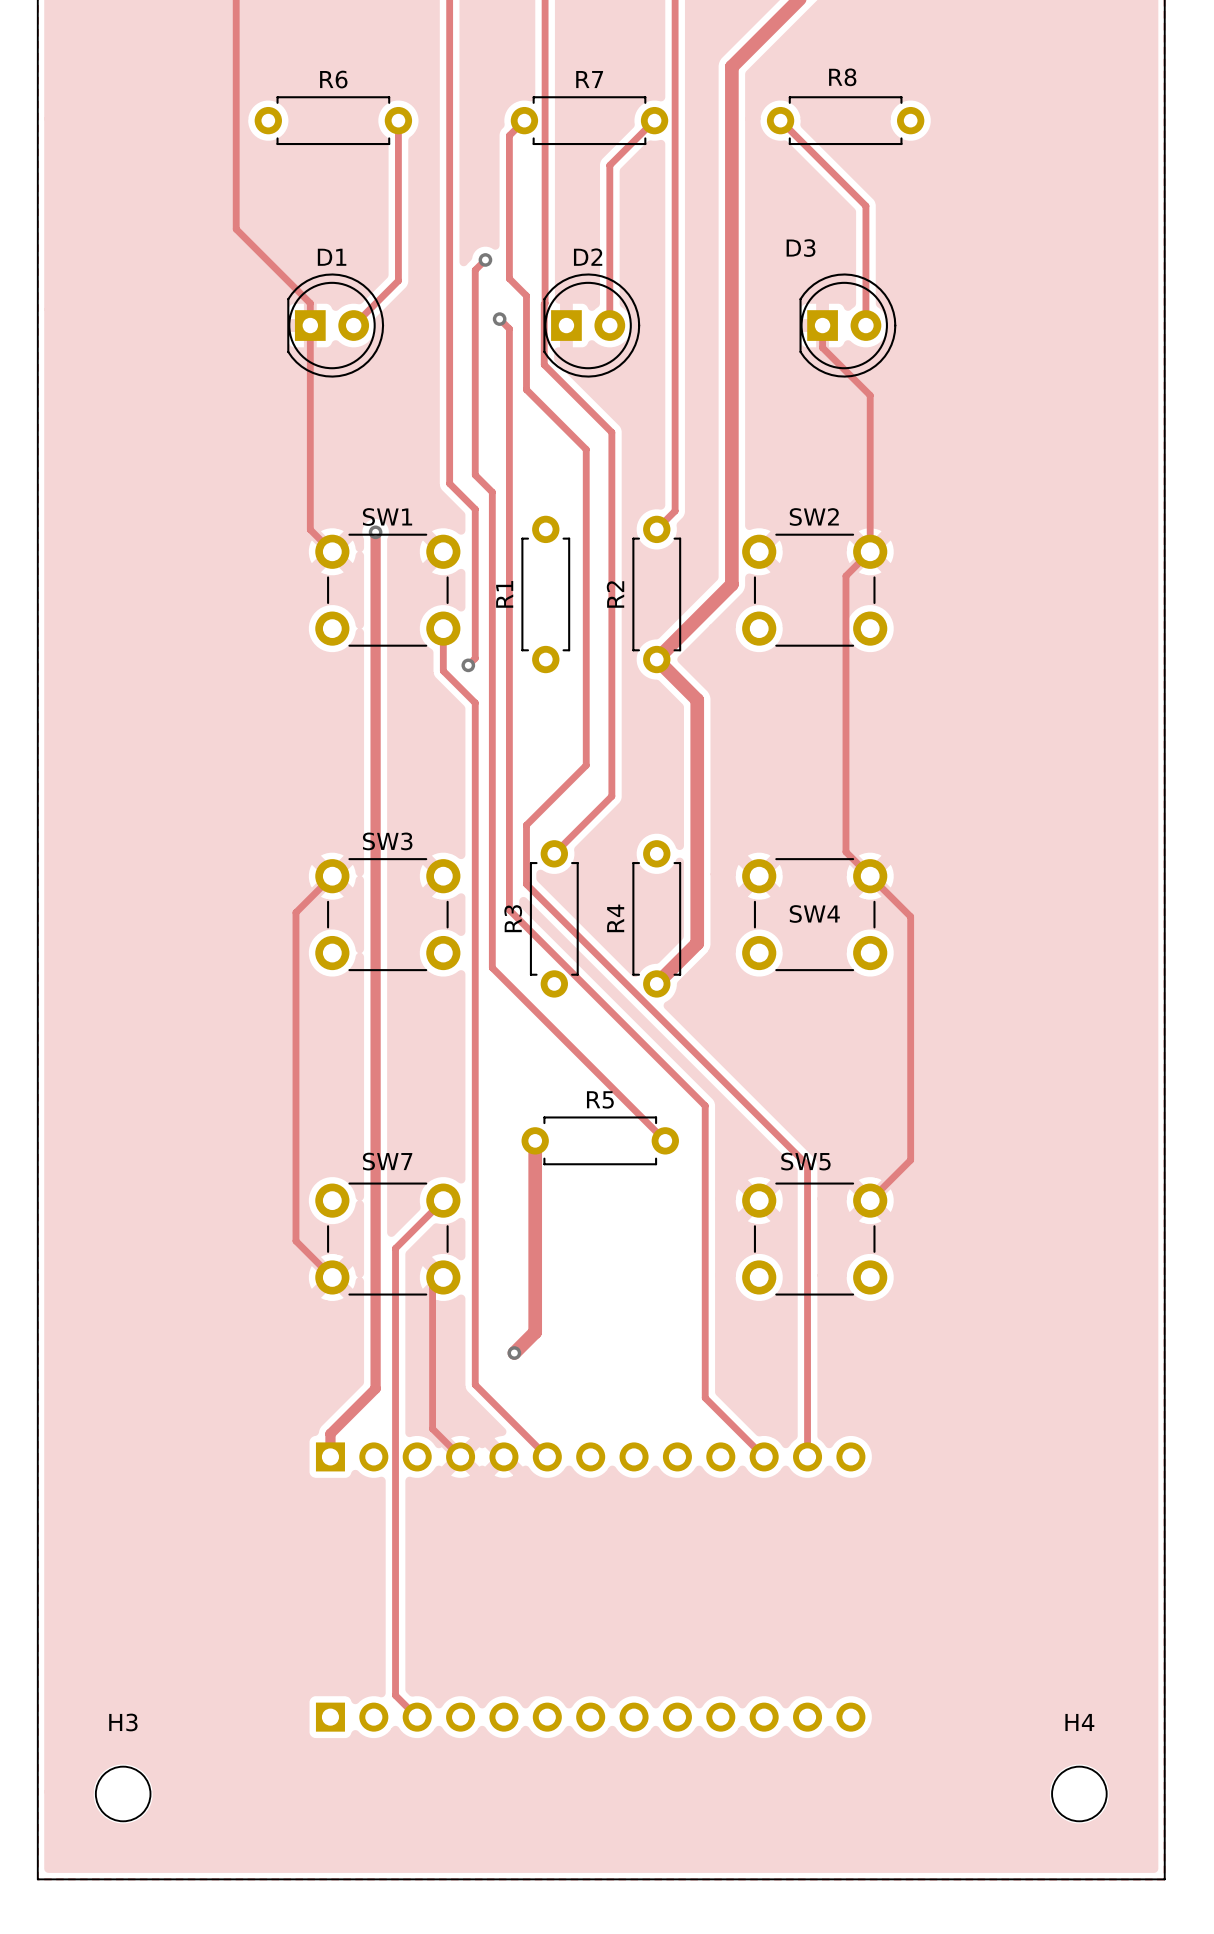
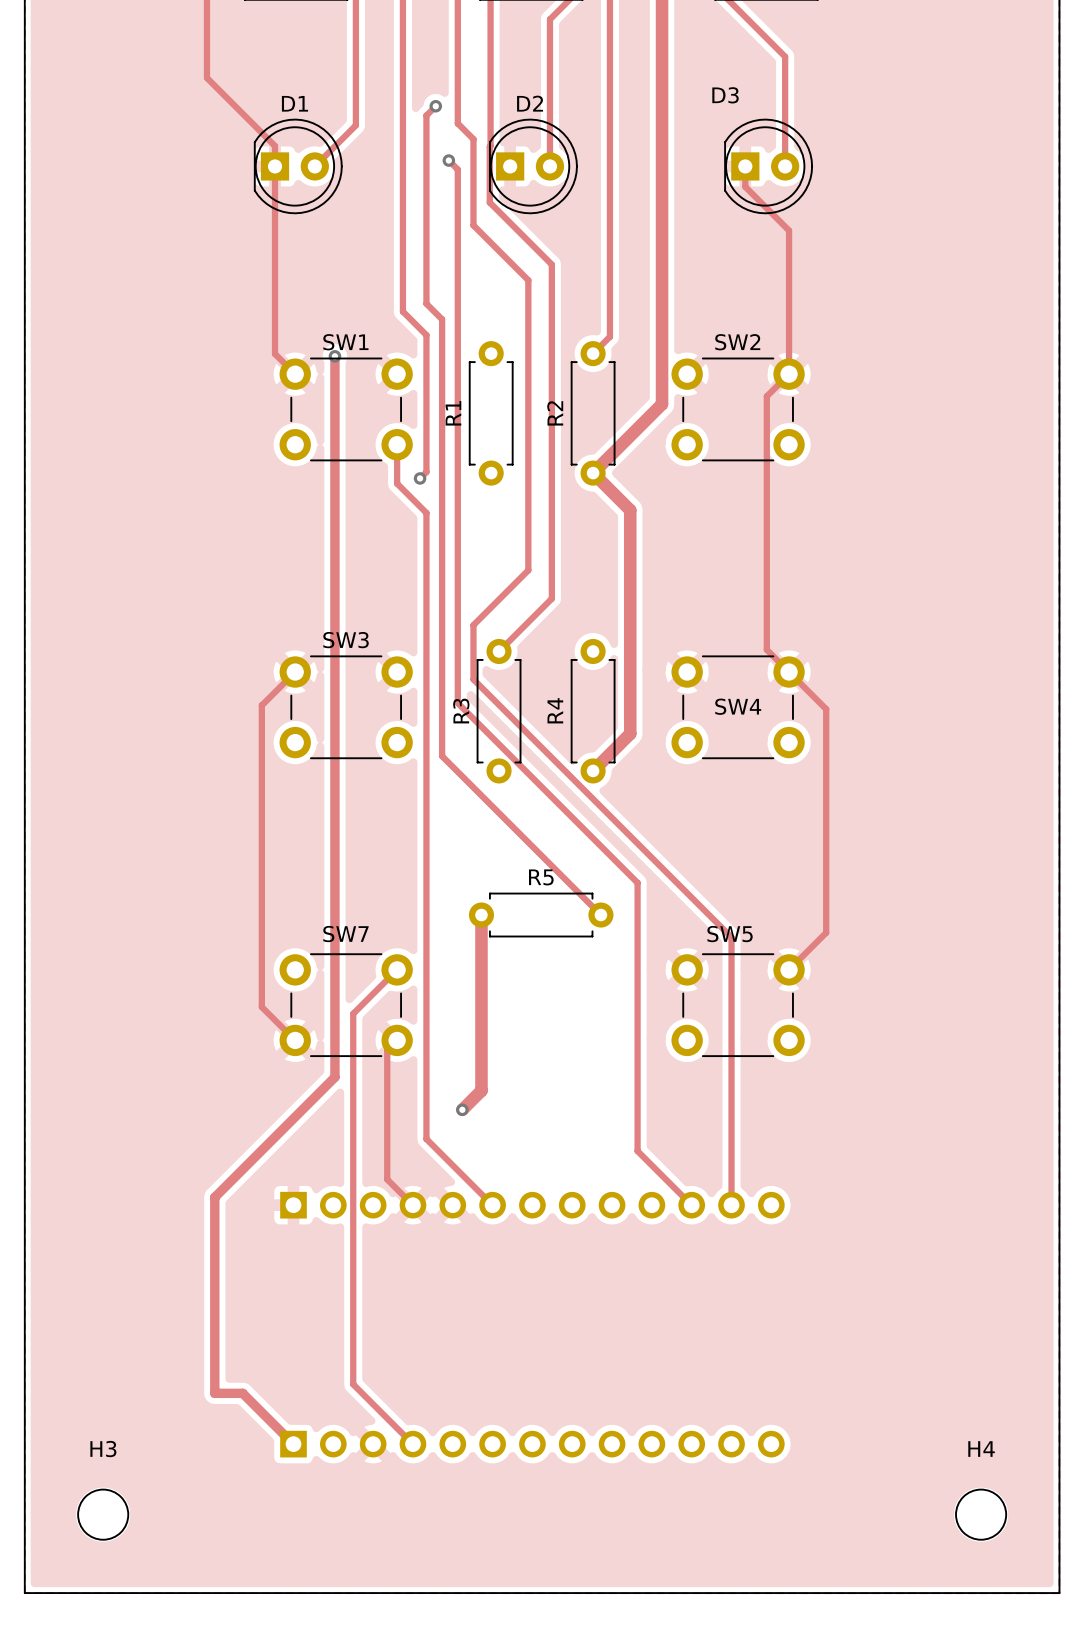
track: (375, 1317) (375, 1388) (330, 1433) (330, 1456) -> (334, 1077) (214, 1197) (214, 1393) (242, 1393) (293, 1444)
track: (395, 1652) (395, 1695) (417, 1717) -> (353, 1384) (412, 1444)

